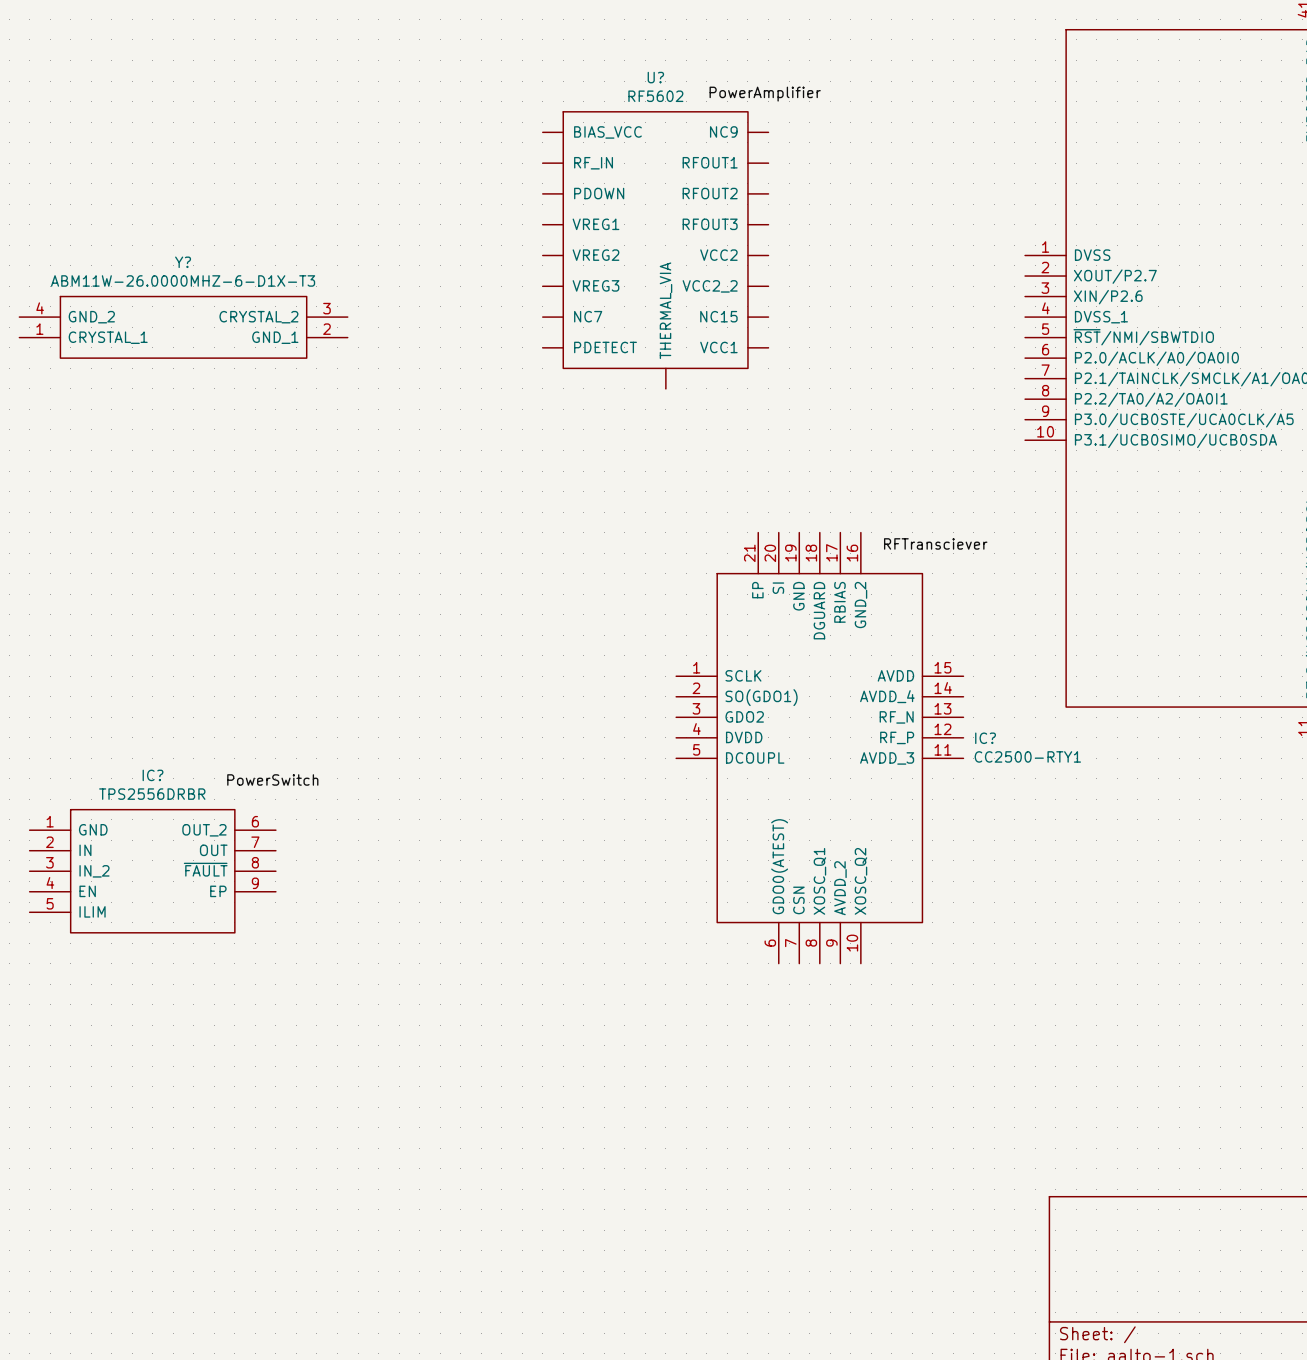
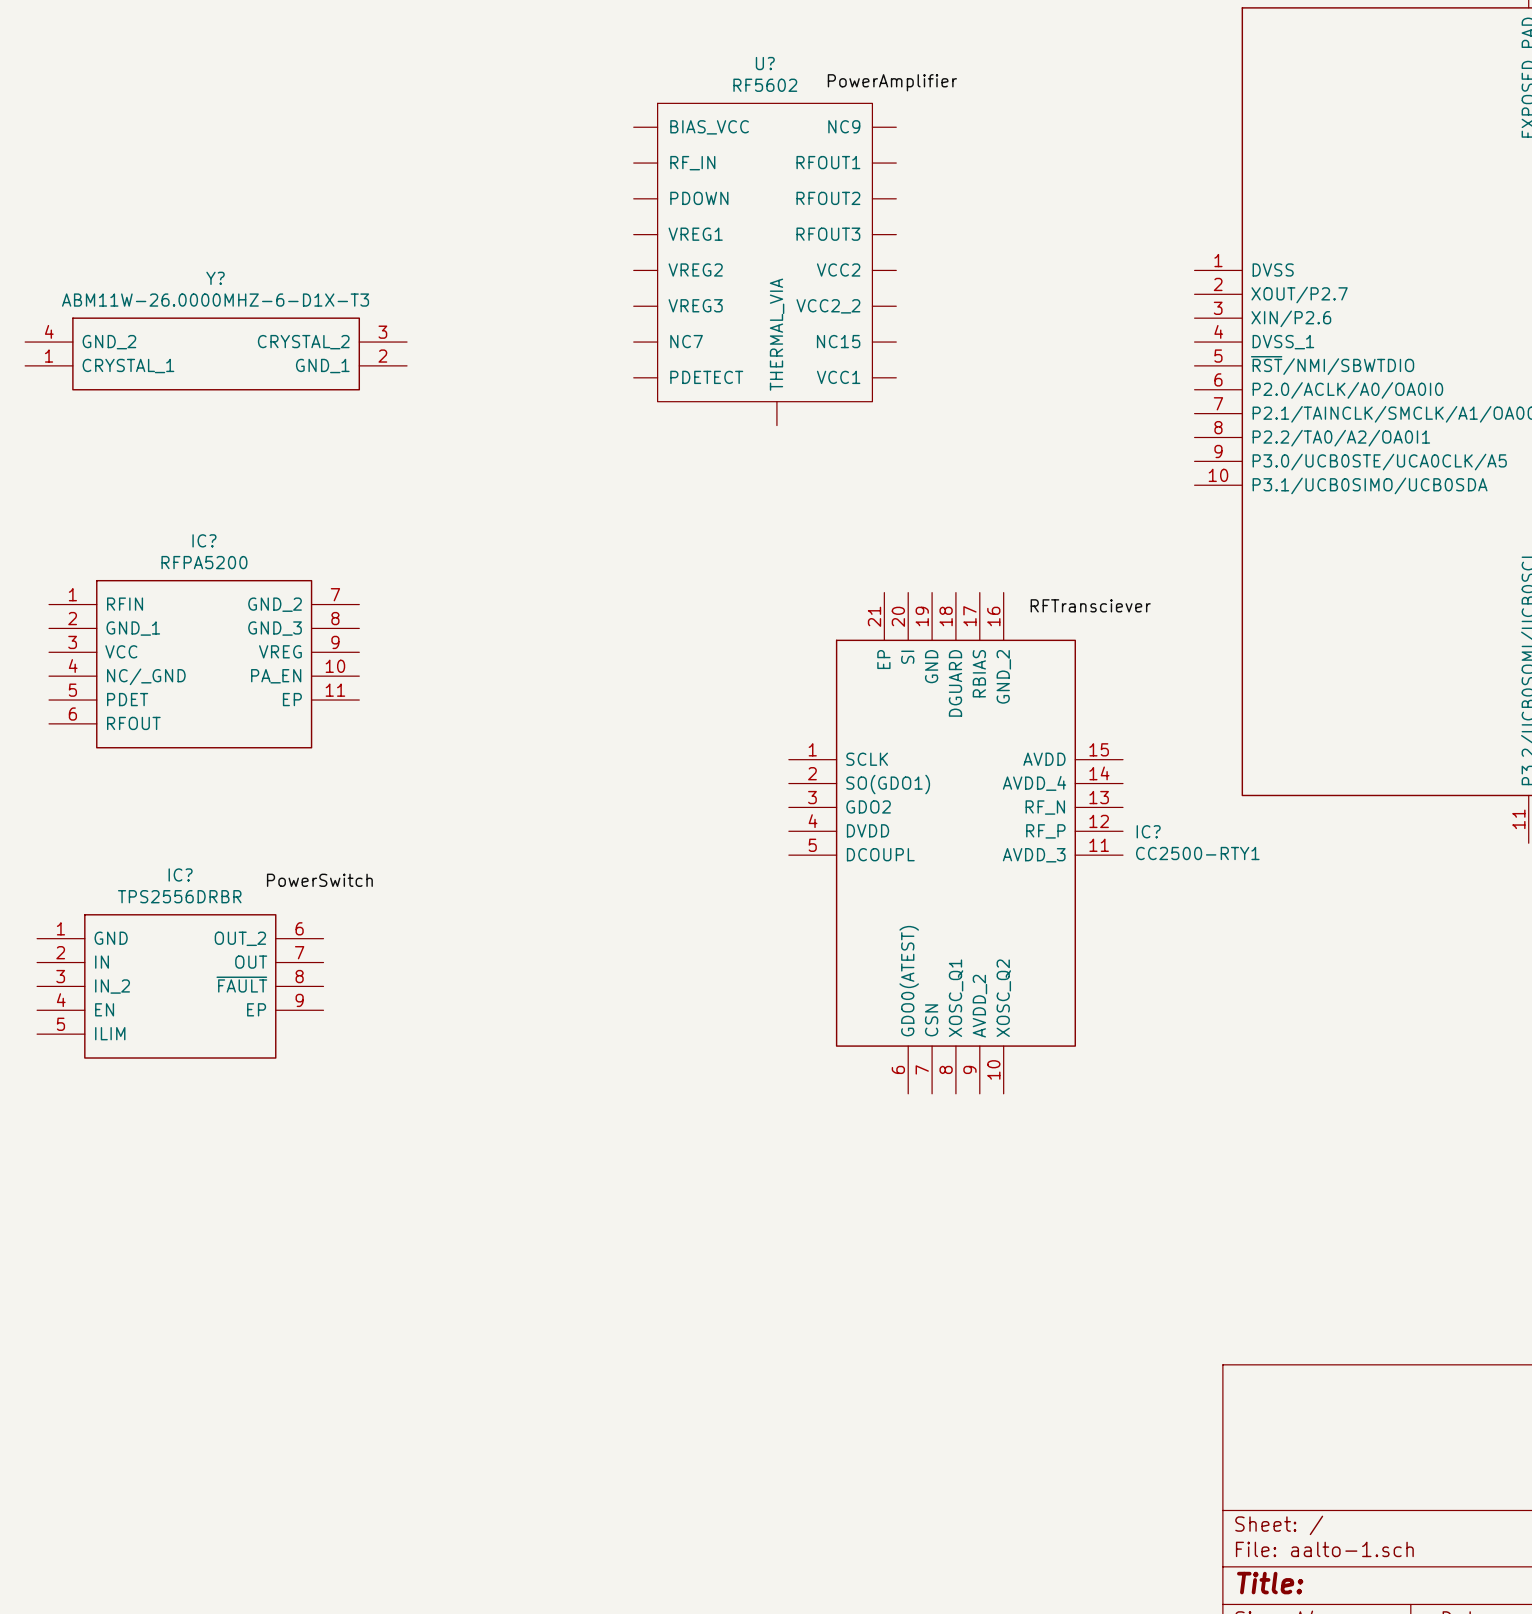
IC?: none -> RFPA5200 (204, 664)

